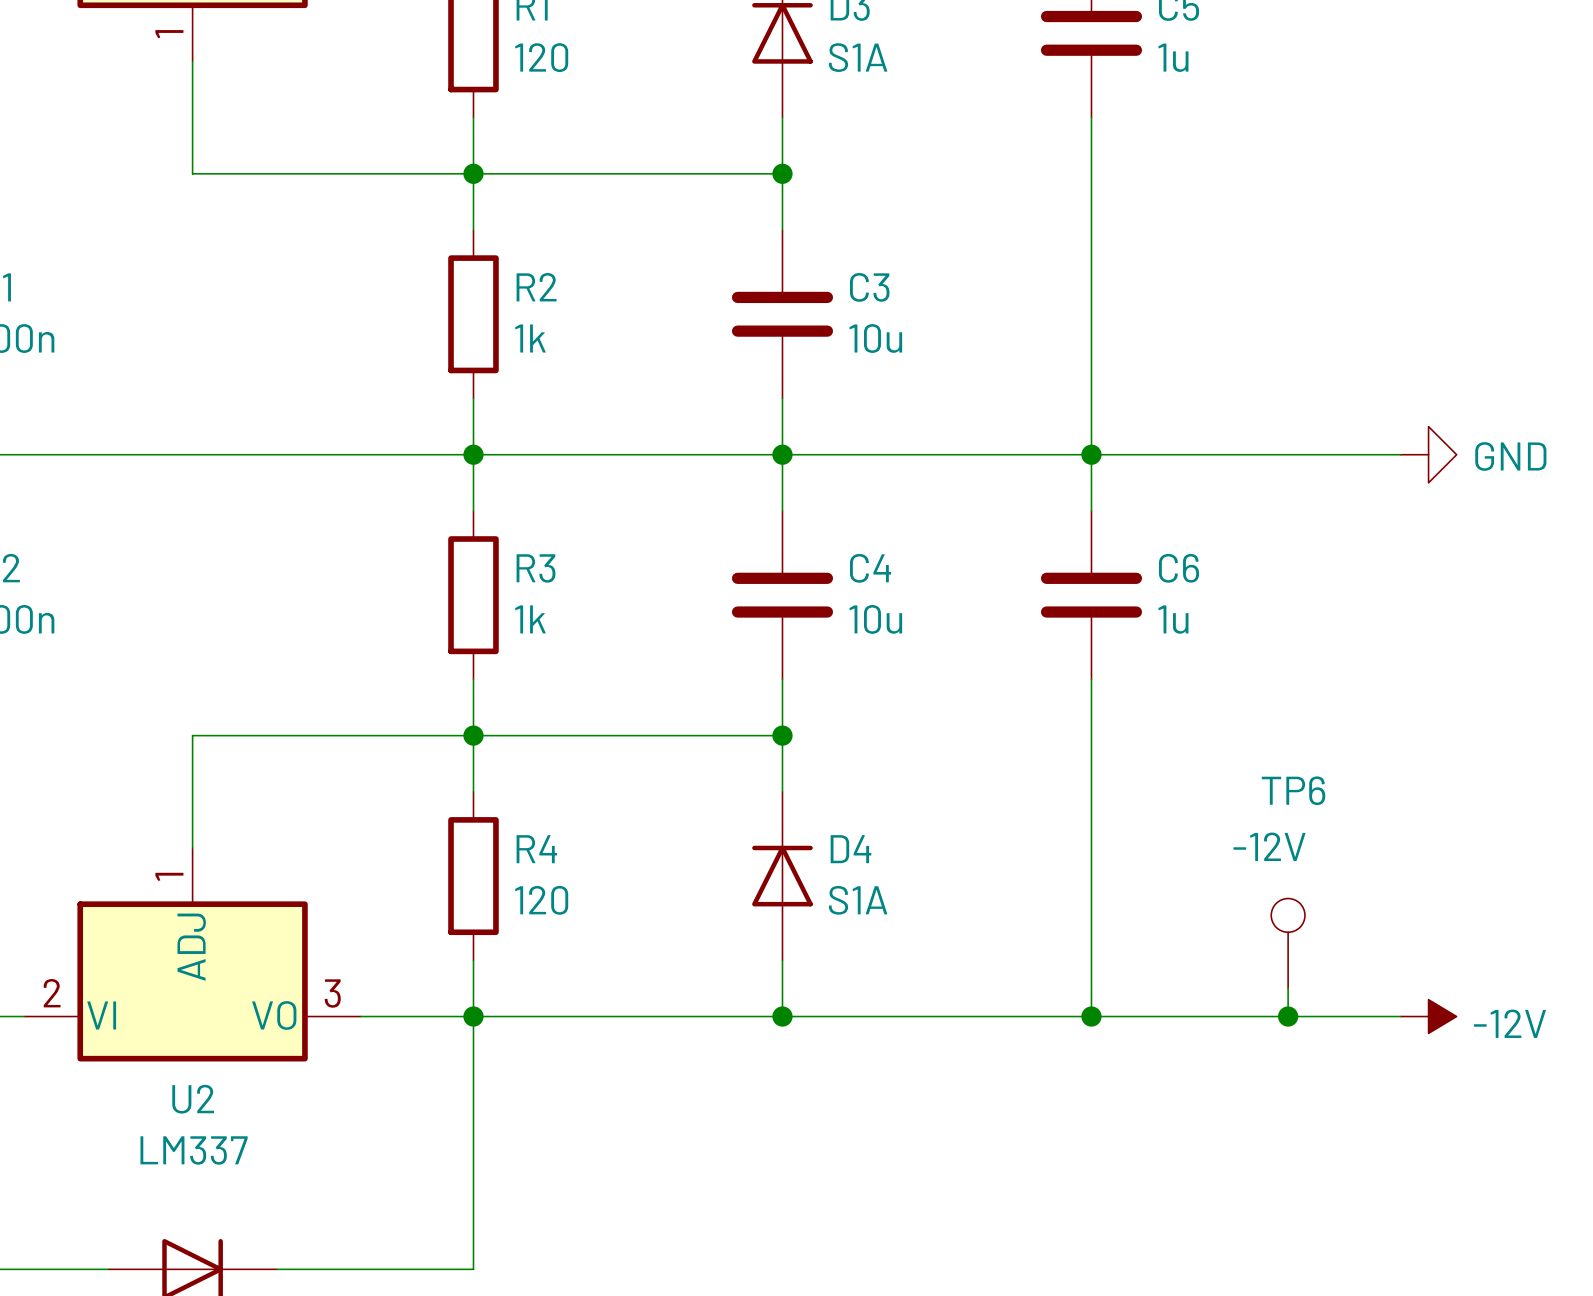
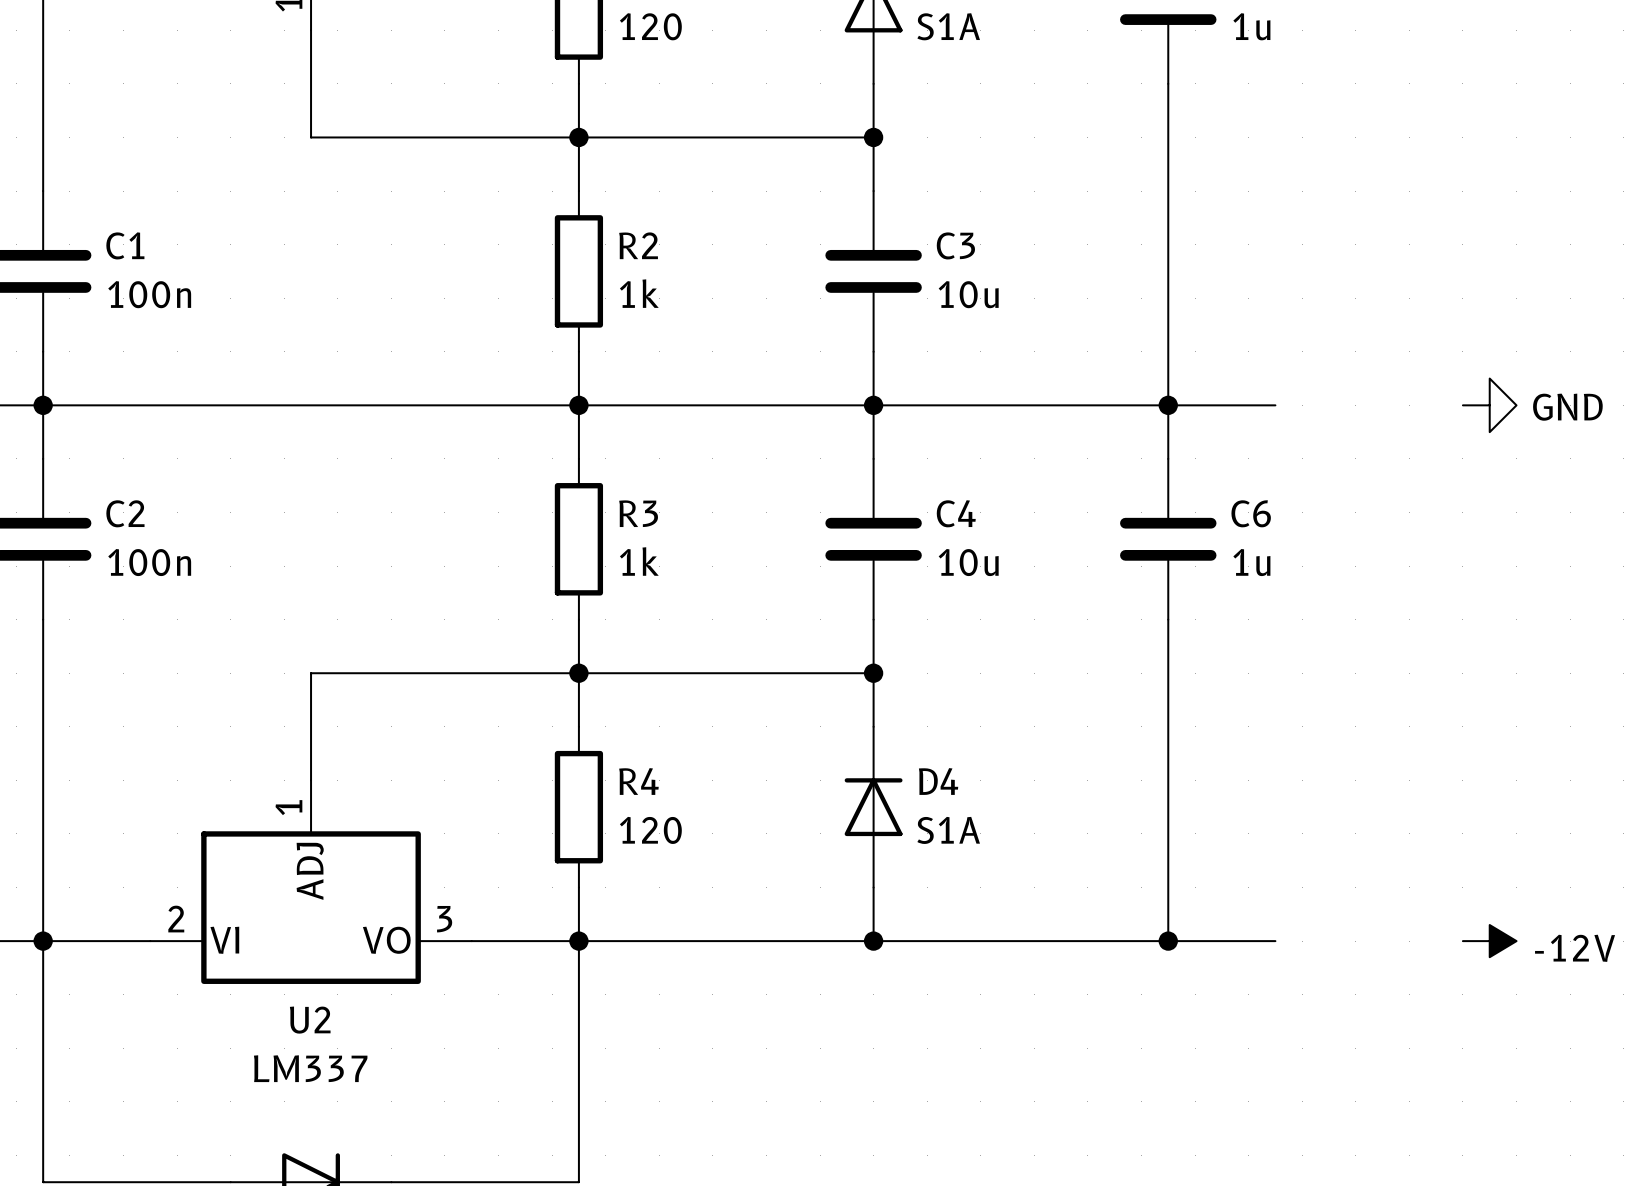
wire: (1203, 454) (1400, 454) -> none
TP6: -12V (1288, 943) -> none
wire: (1288, 988) (1288, 1016) -> none
wire: (1203, 1016) (1400, 1016) -> none
junction: (1288, 1016) -> none

